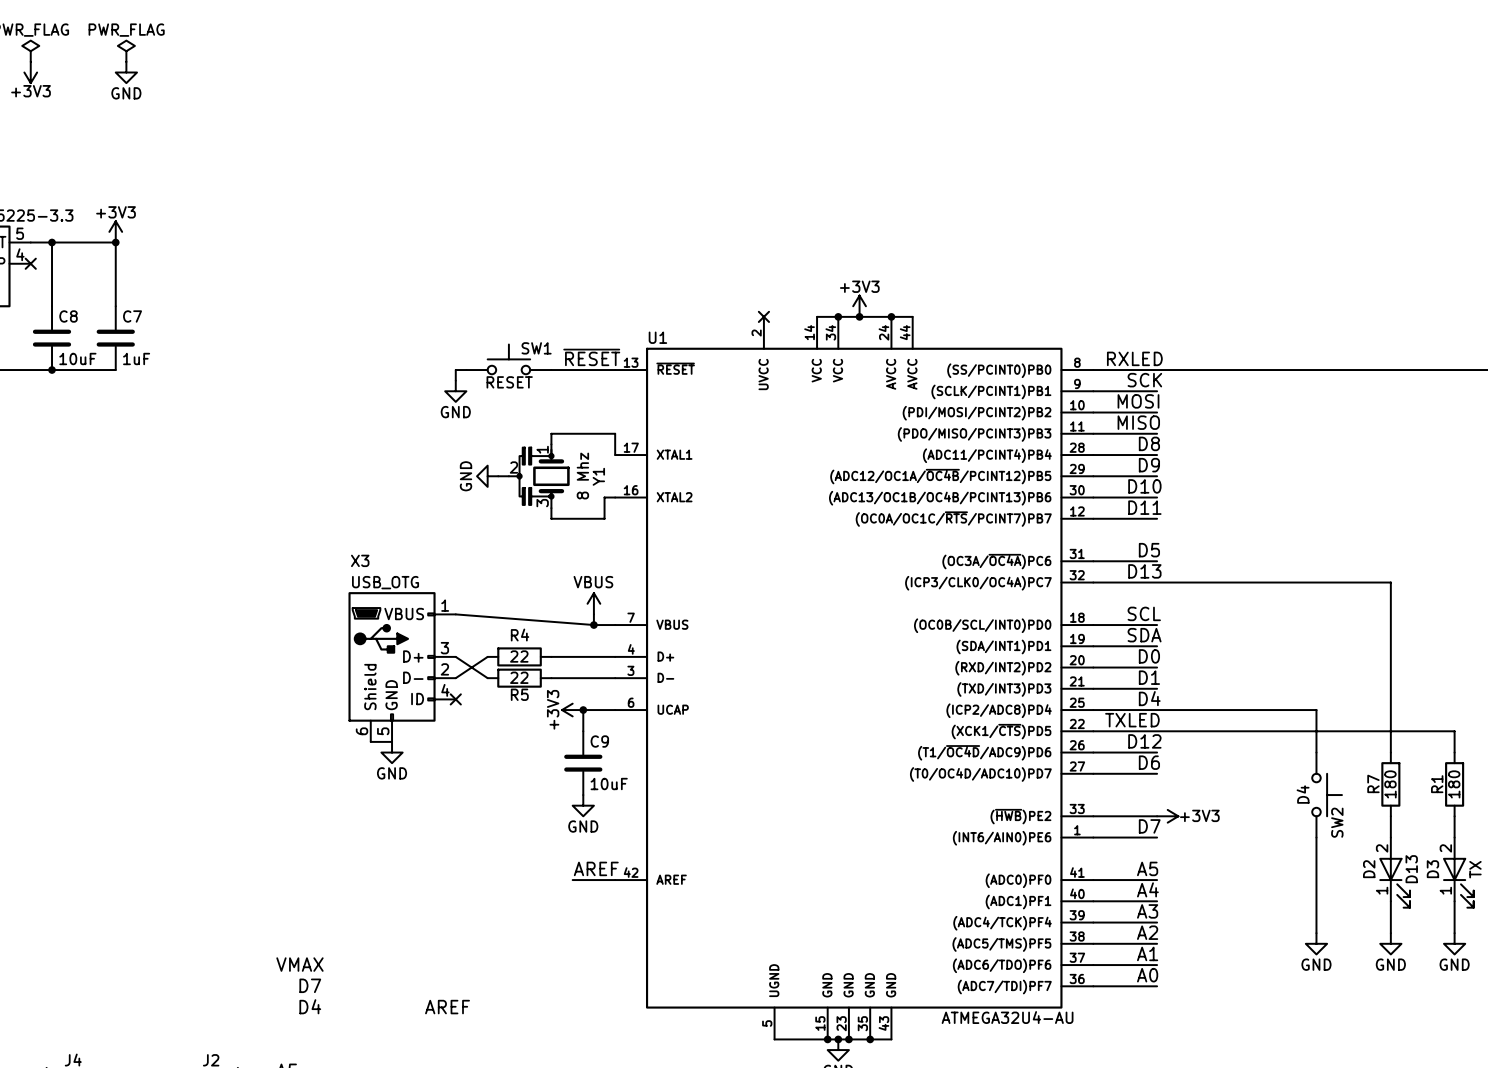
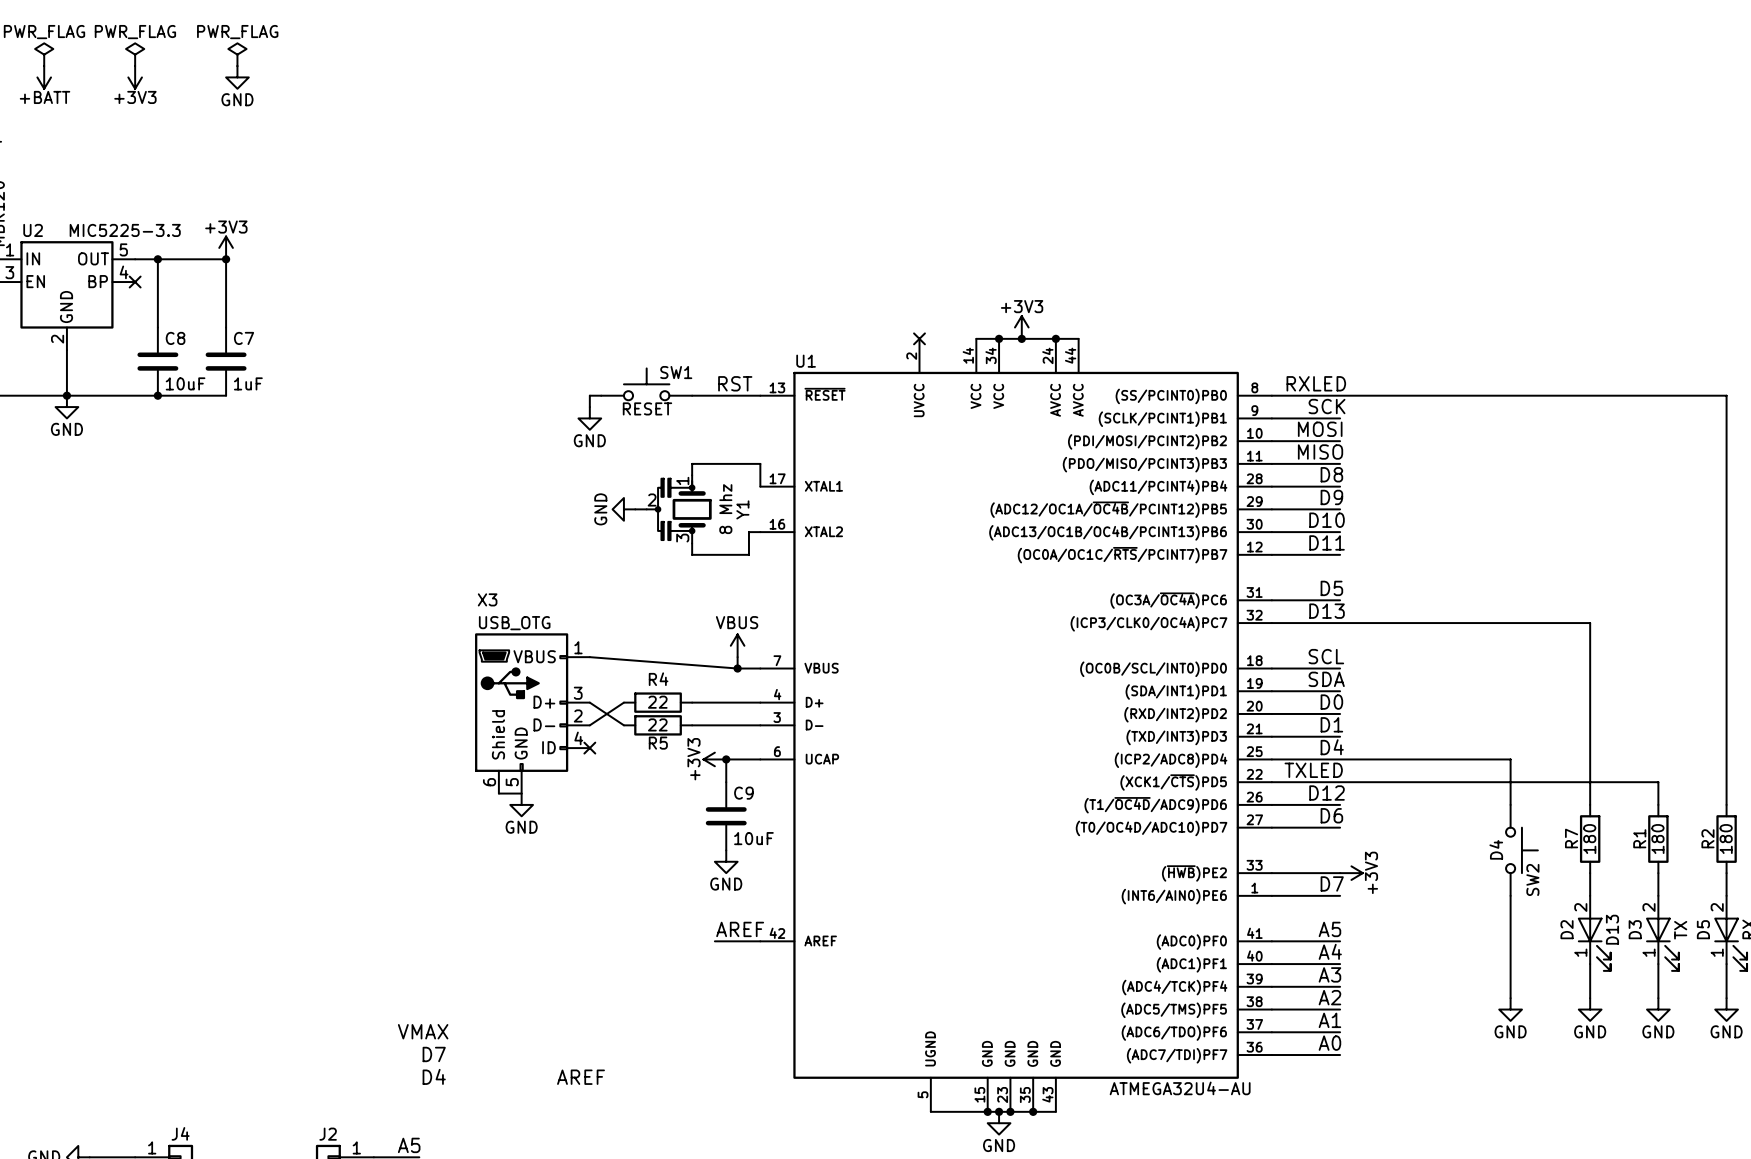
label: ~{RESET} (591, 357) -> none
label: none -> RST (735, 383)
power symbol text rotation: 0° (1199, 815) -> 90° counterclockwise (1371, 872)

